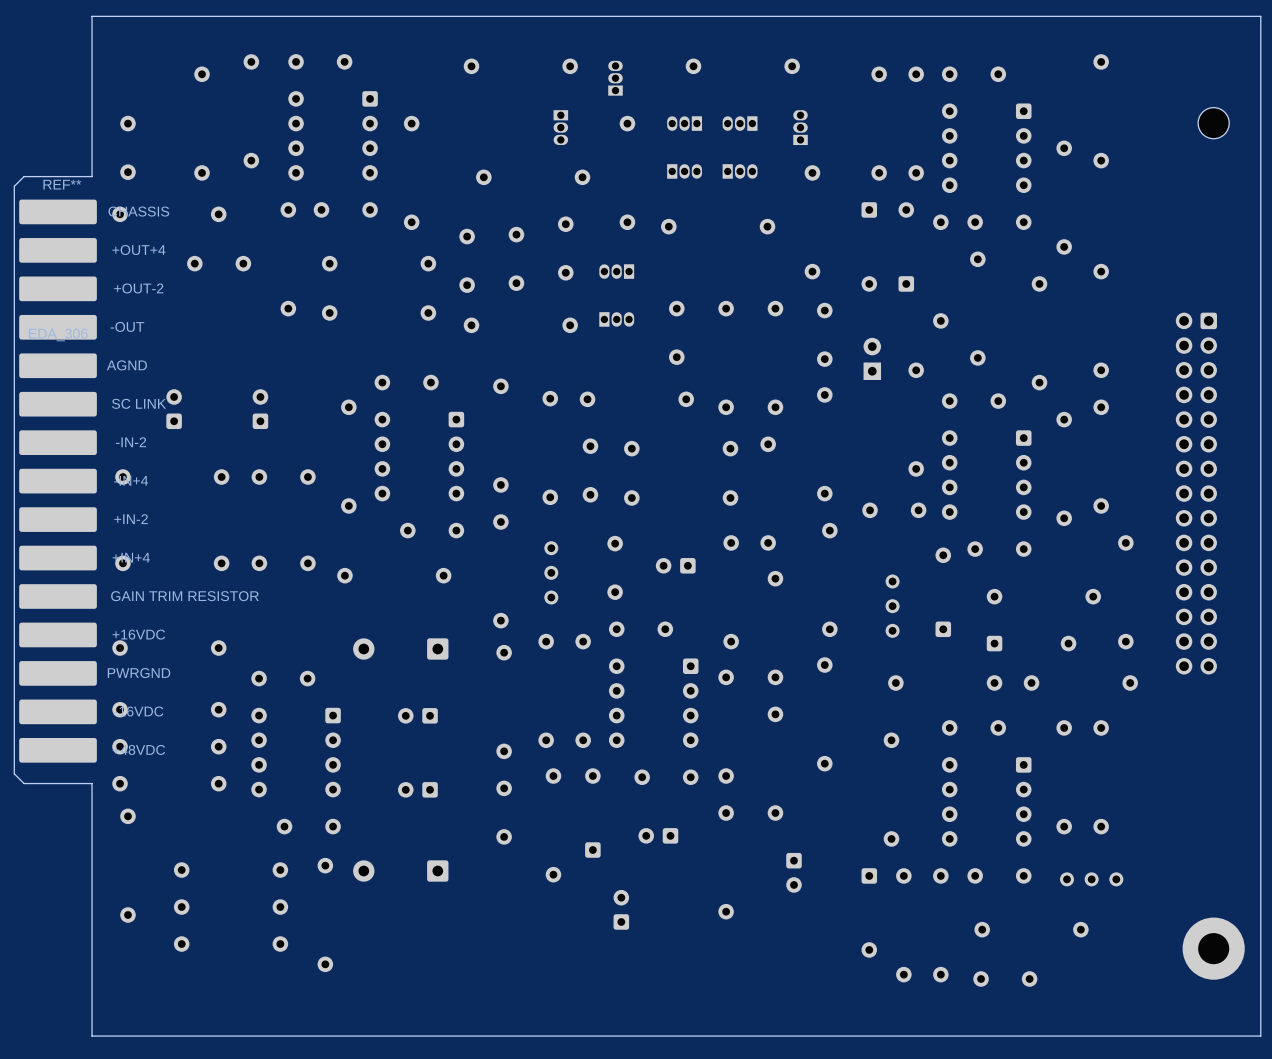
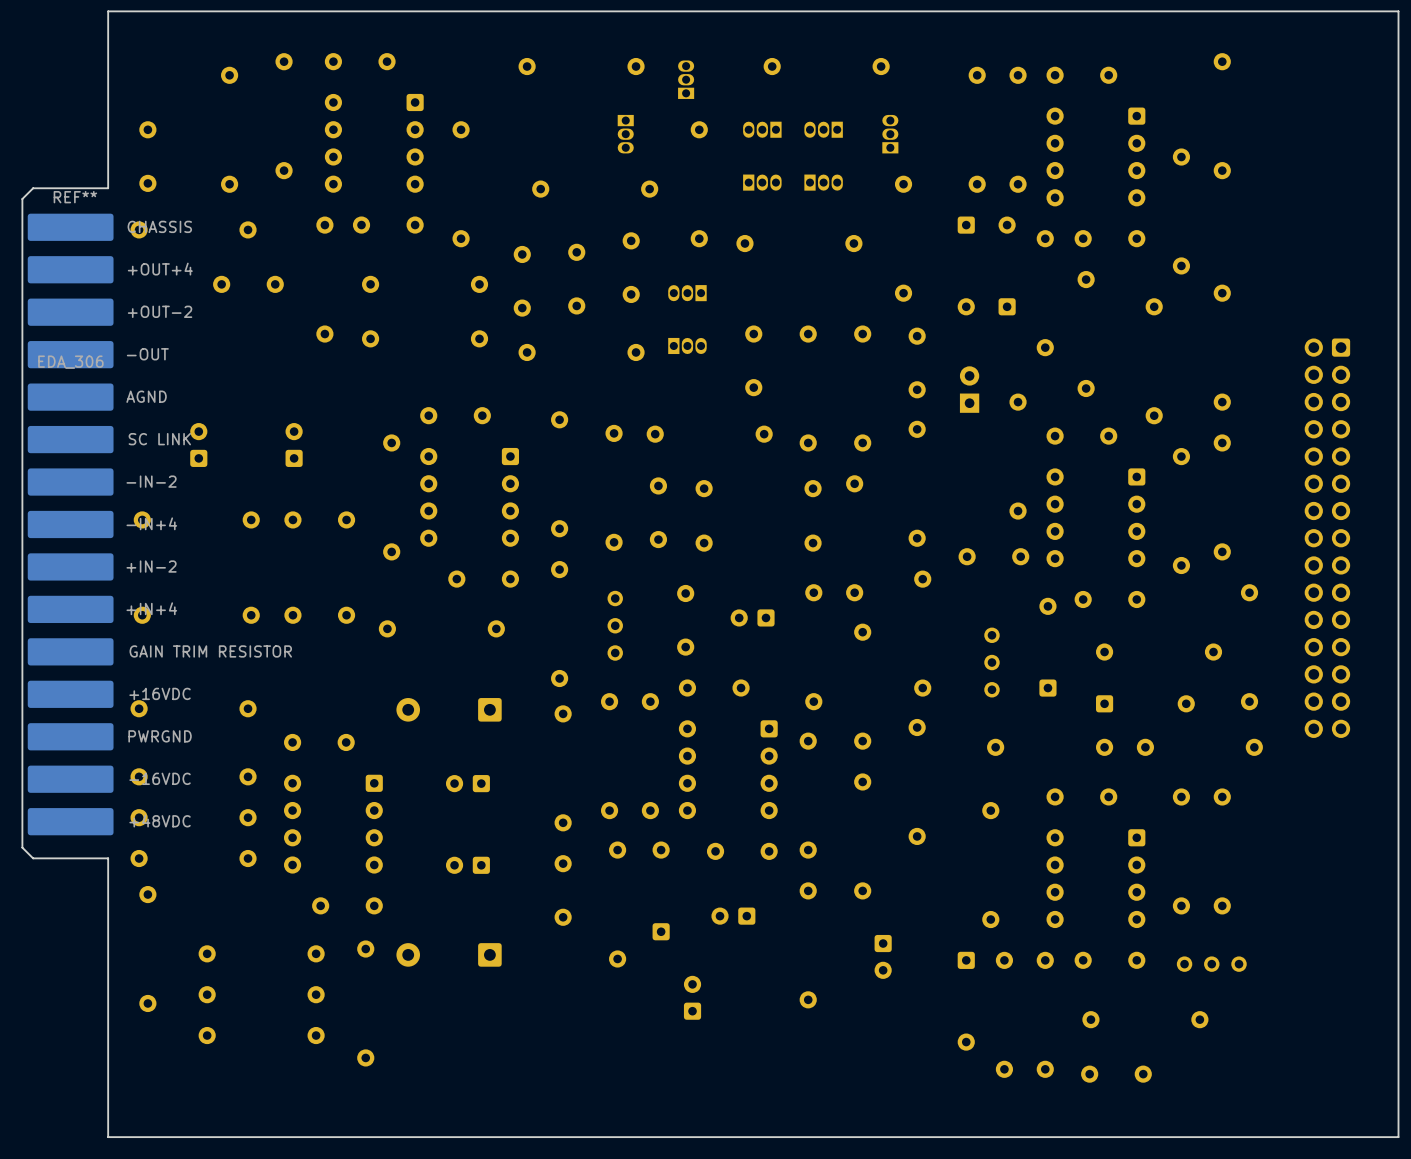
part: (1213, 123) -> none
part: (1213, 948) -> none

